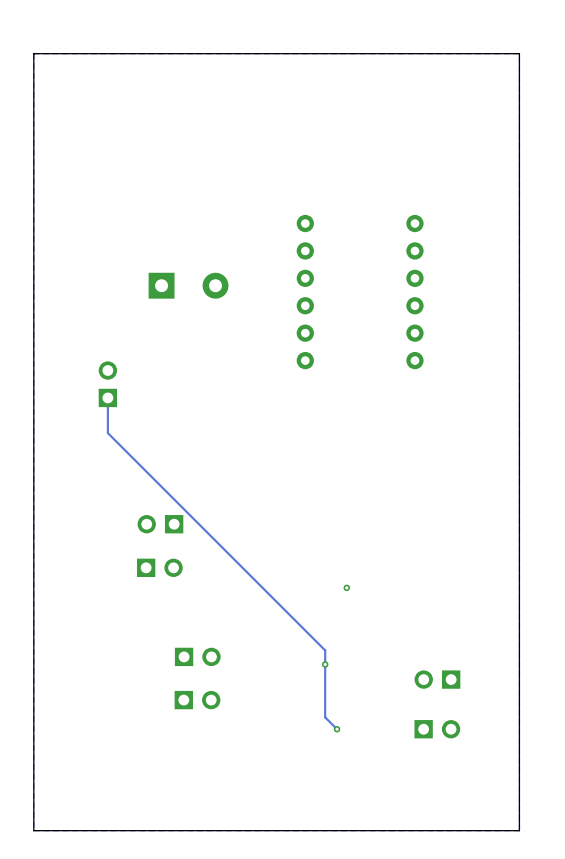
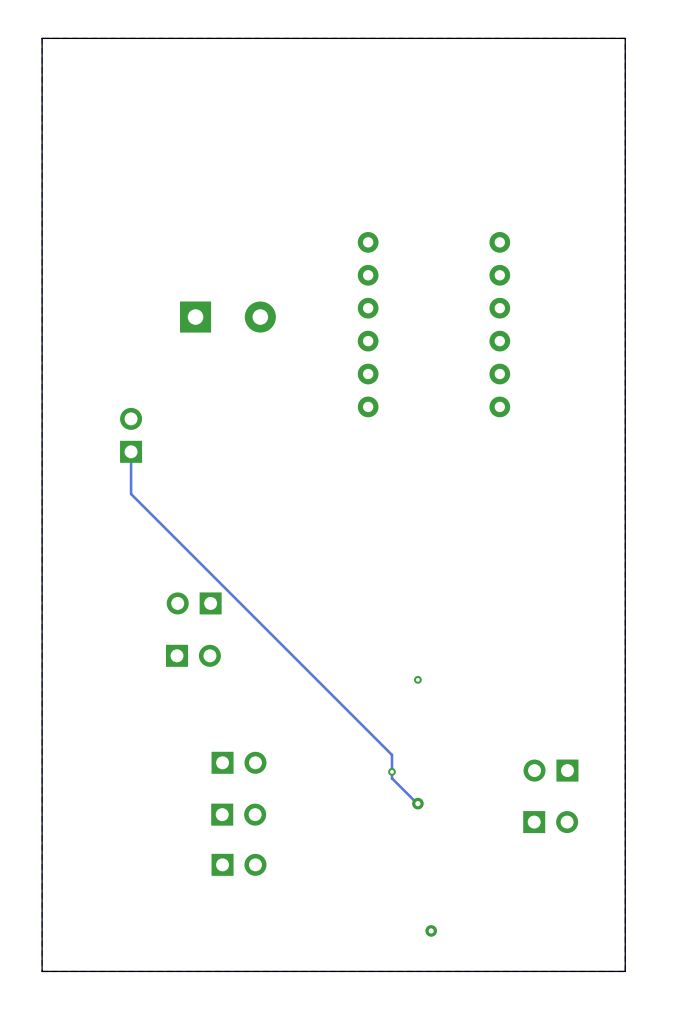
part: none -> (551, 770)
track: (325, 669) (325, 717) (337, 729) -> (391, 778) (417, 803)
part: (437, 679) -> none
via: none -> (417, 803)
part: none -> (550, 822)
via: (337, 729) -> none
part: (437, 729) -> none
part: none -> (239, 864)
via: none -> (431, 930)

